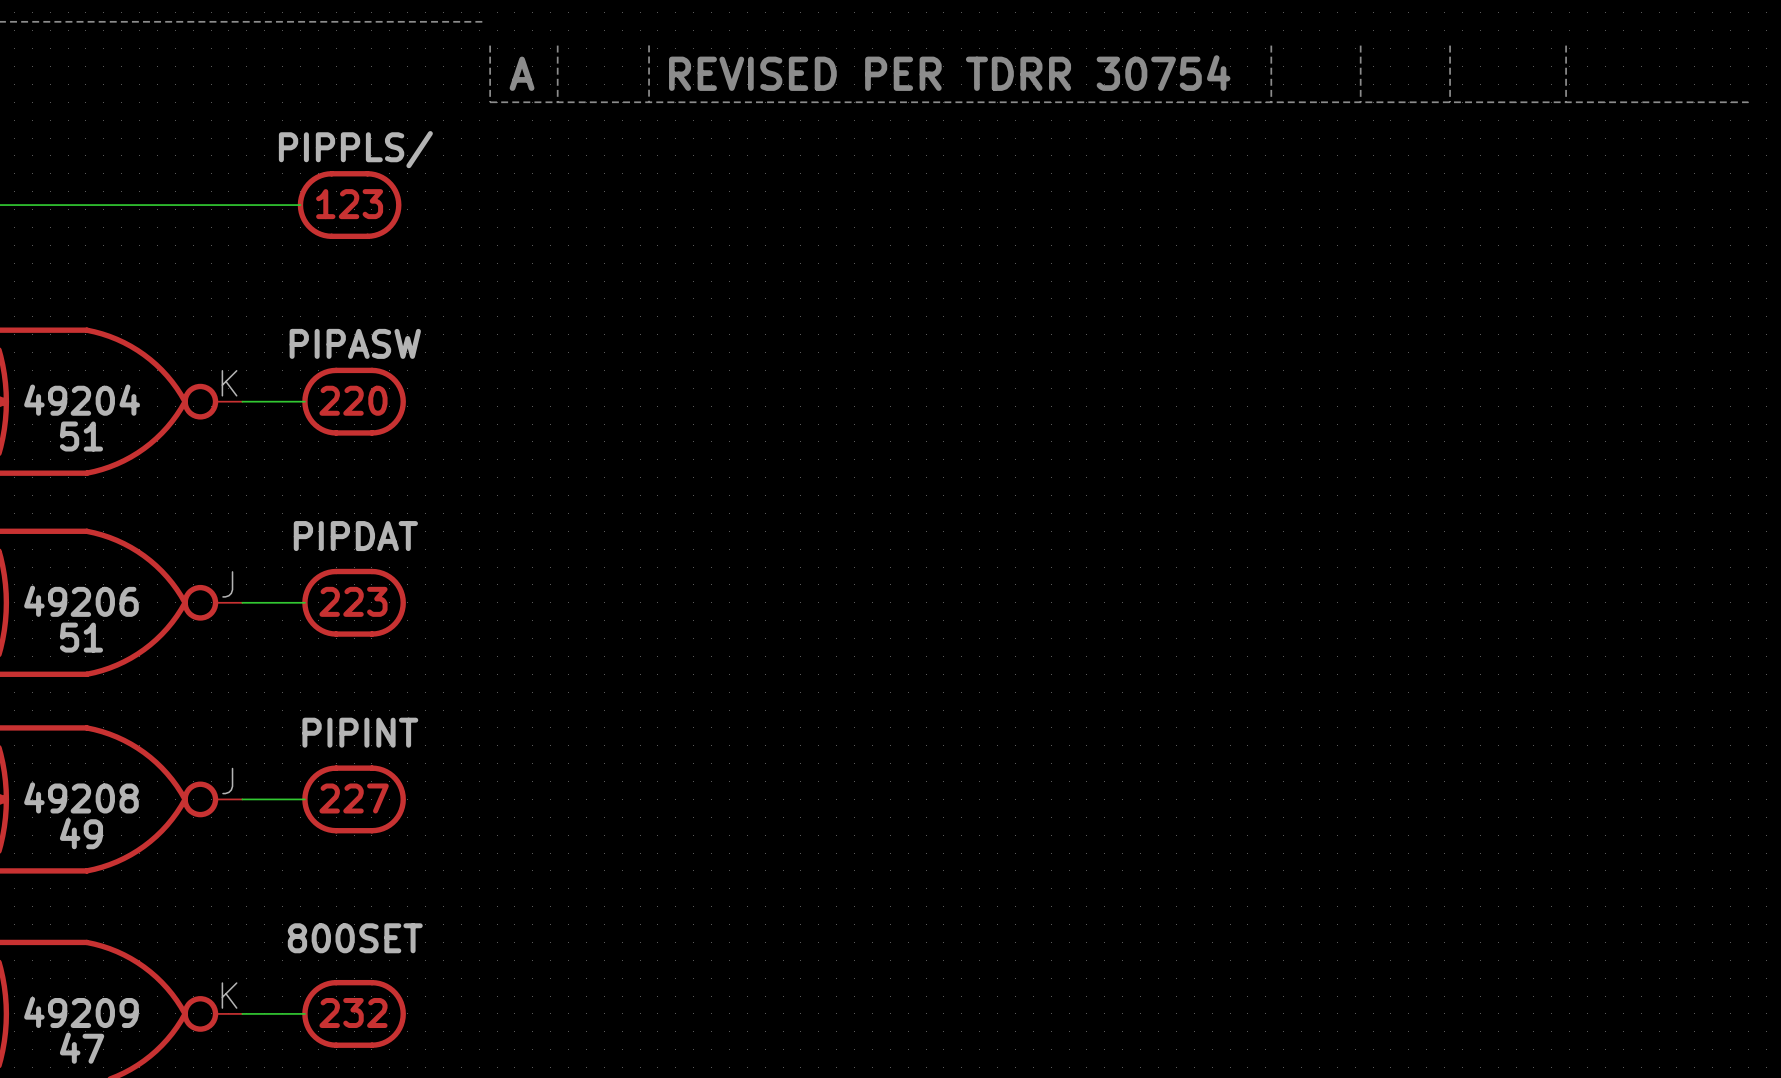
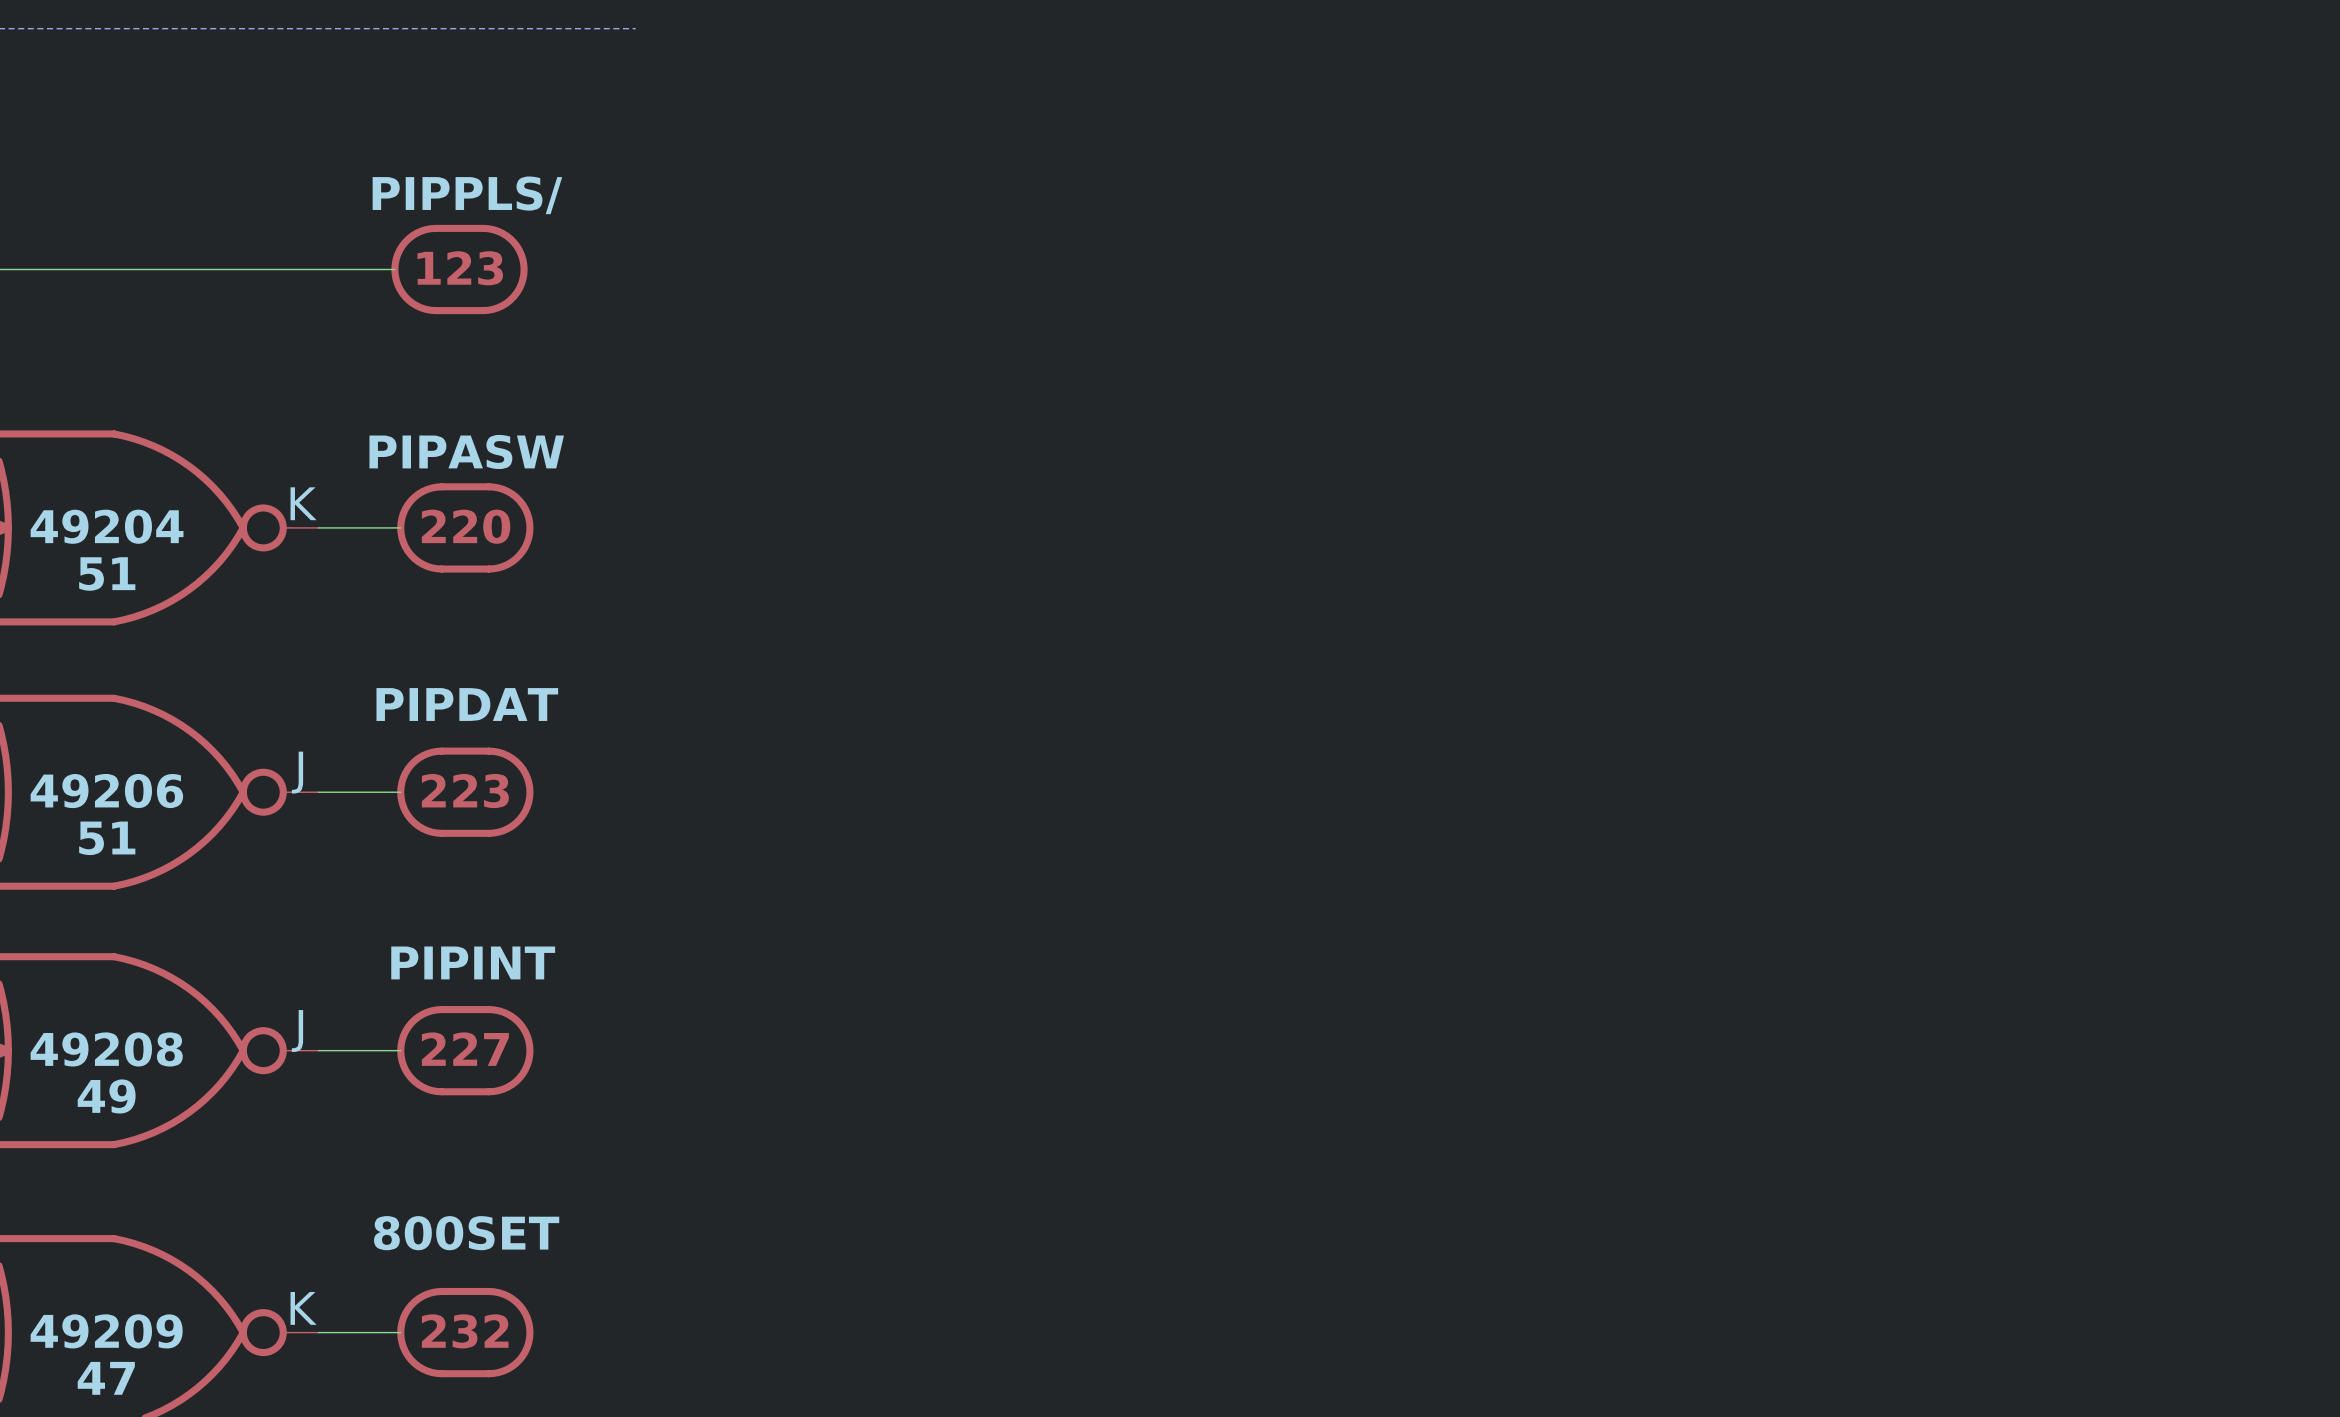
line: (490, 45) (490, 102) (1748, 102) -> none
line: (557, 45) (557, 102) -> none
line: (649, 45) (649, 102) -> none
line: (1271, 45) (1271, 102) -> none
line: (1360, 45) (1360, 102) -> none
line: (1450, 45) (1450, 102) -> none
line: (1566, 45) (1566, 102) -> none
text: A REVISED PER TDRR 30754 (870, 73) -> none

